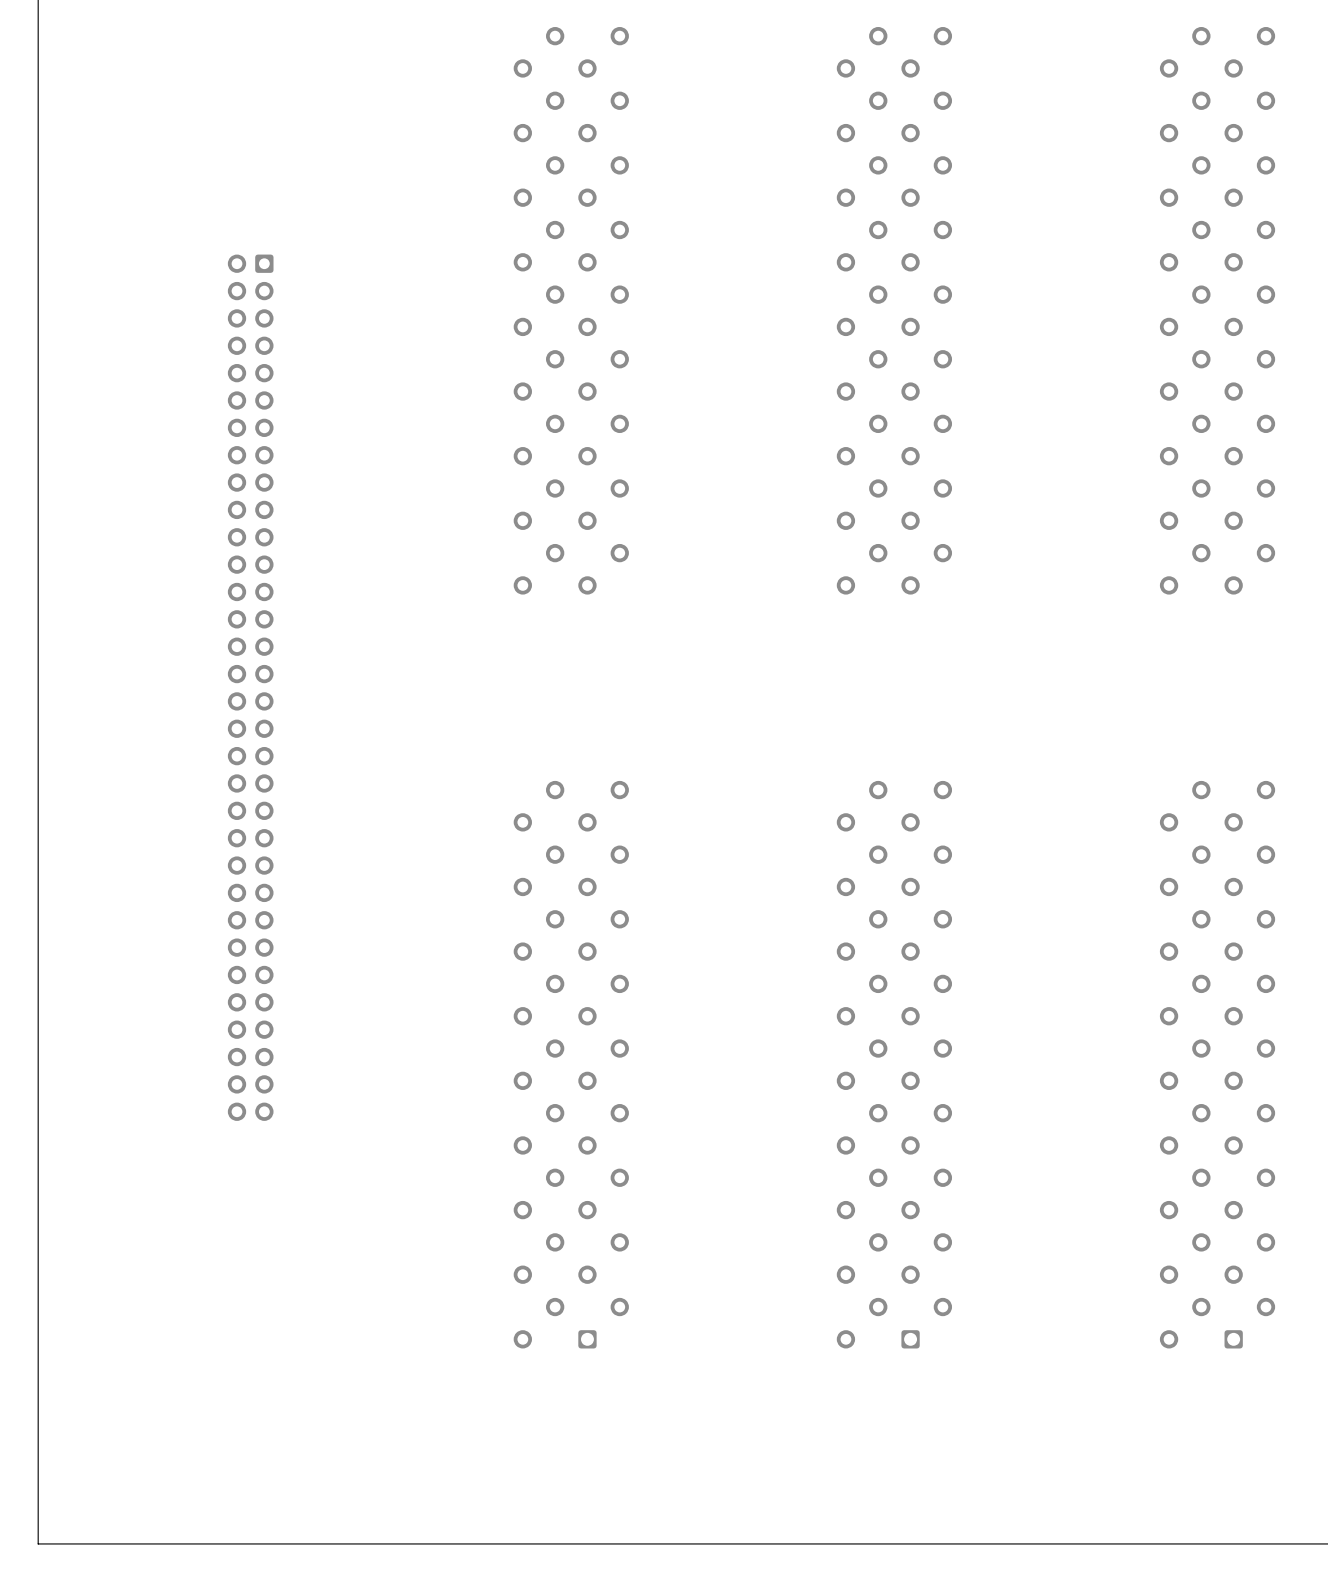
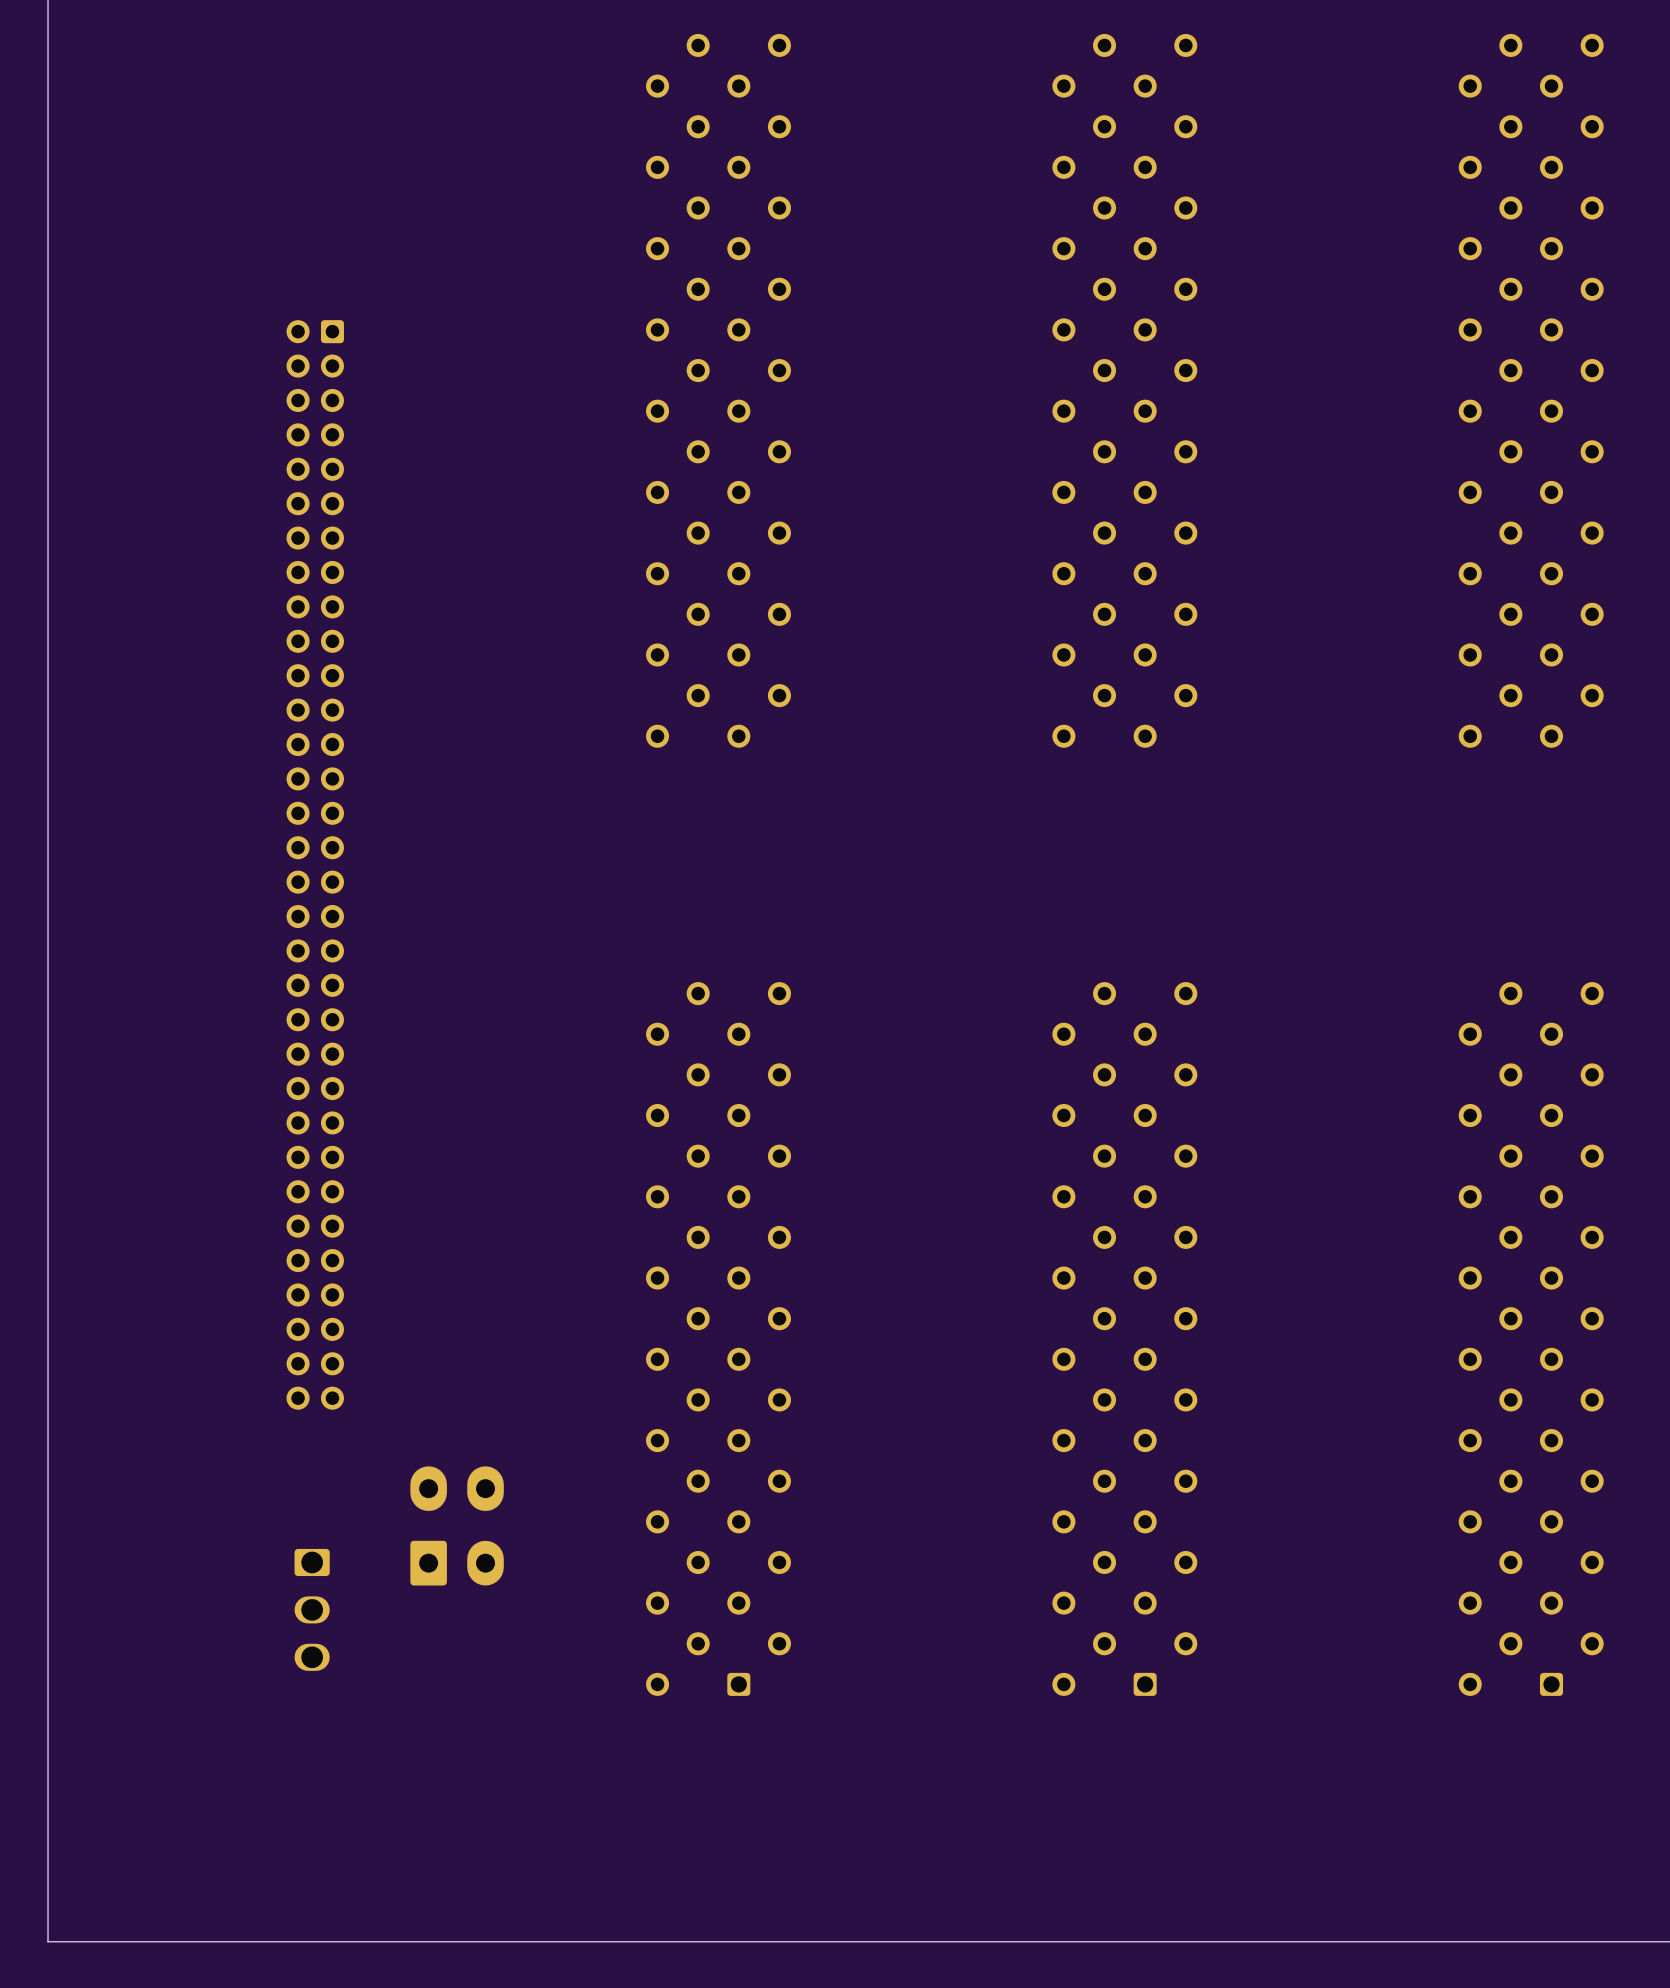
part: none -> (457, 1525)
part: none -> (312, 1609)

